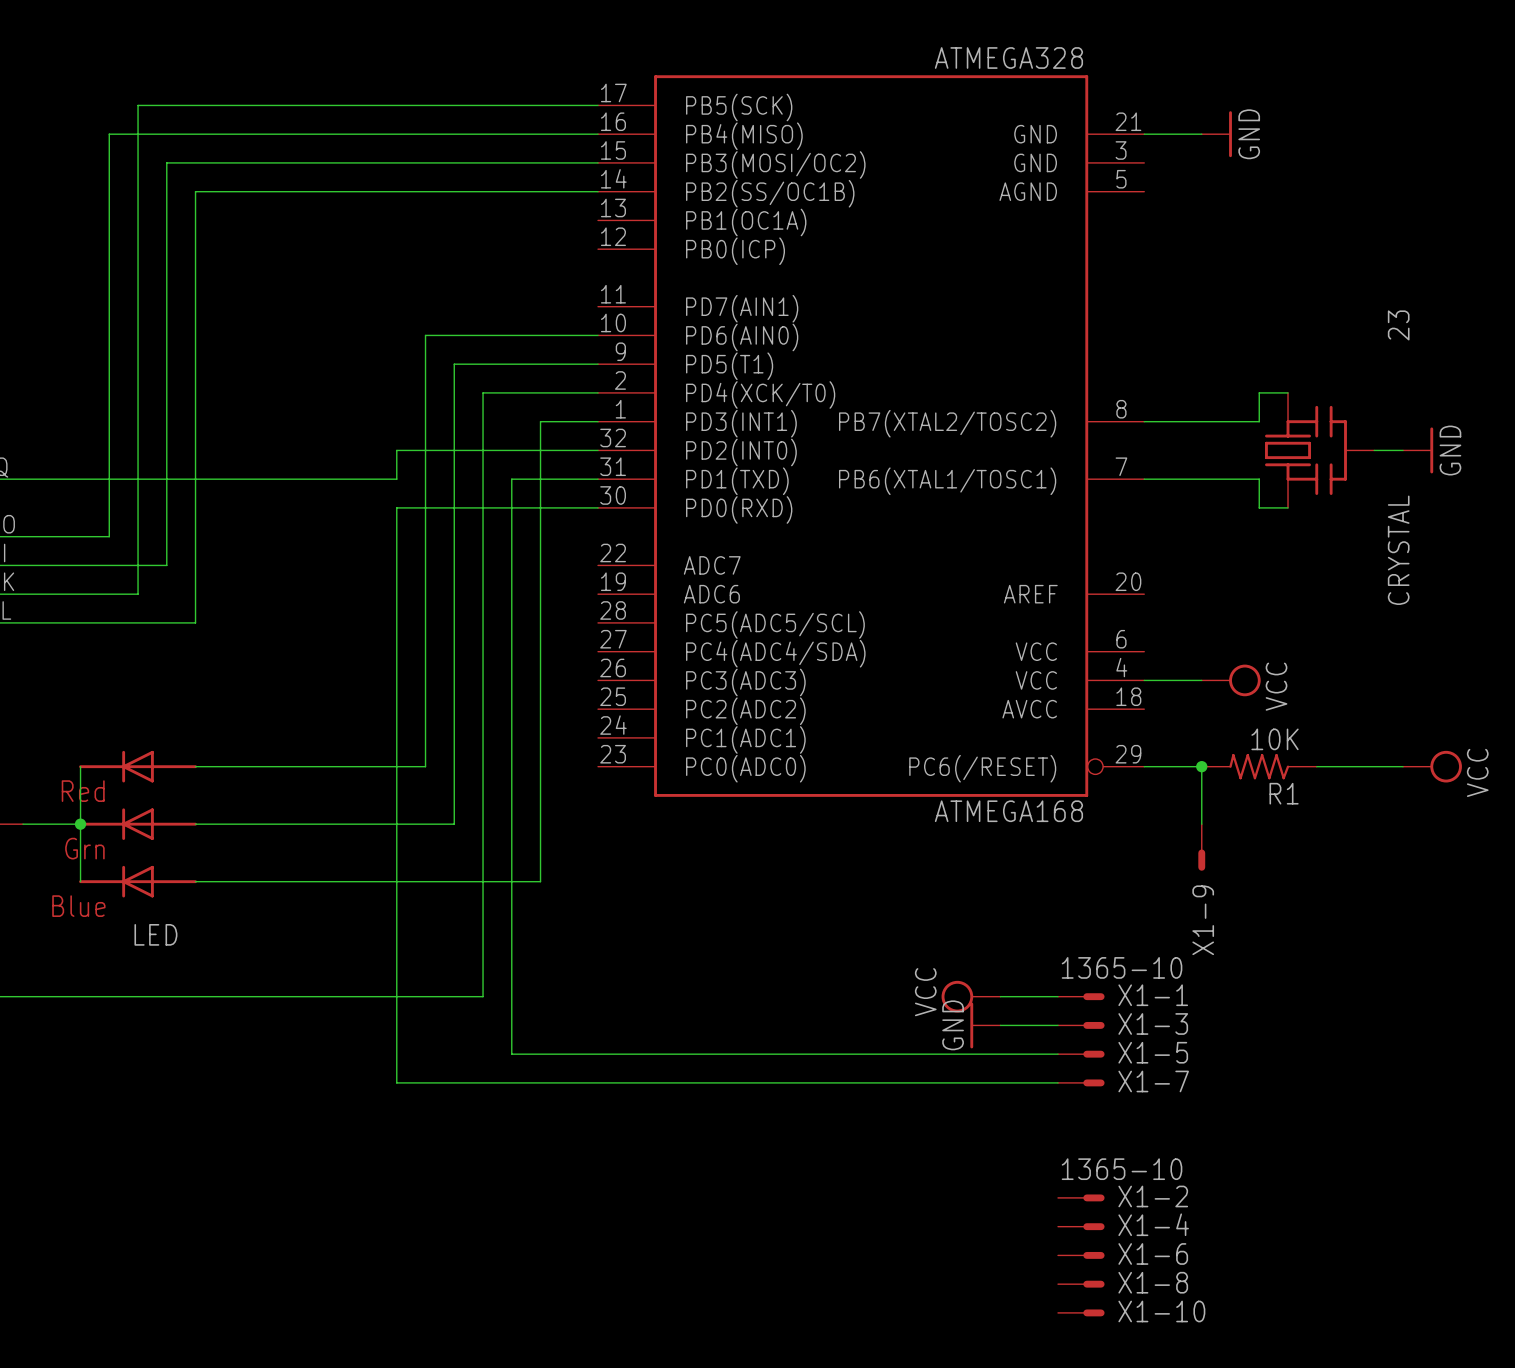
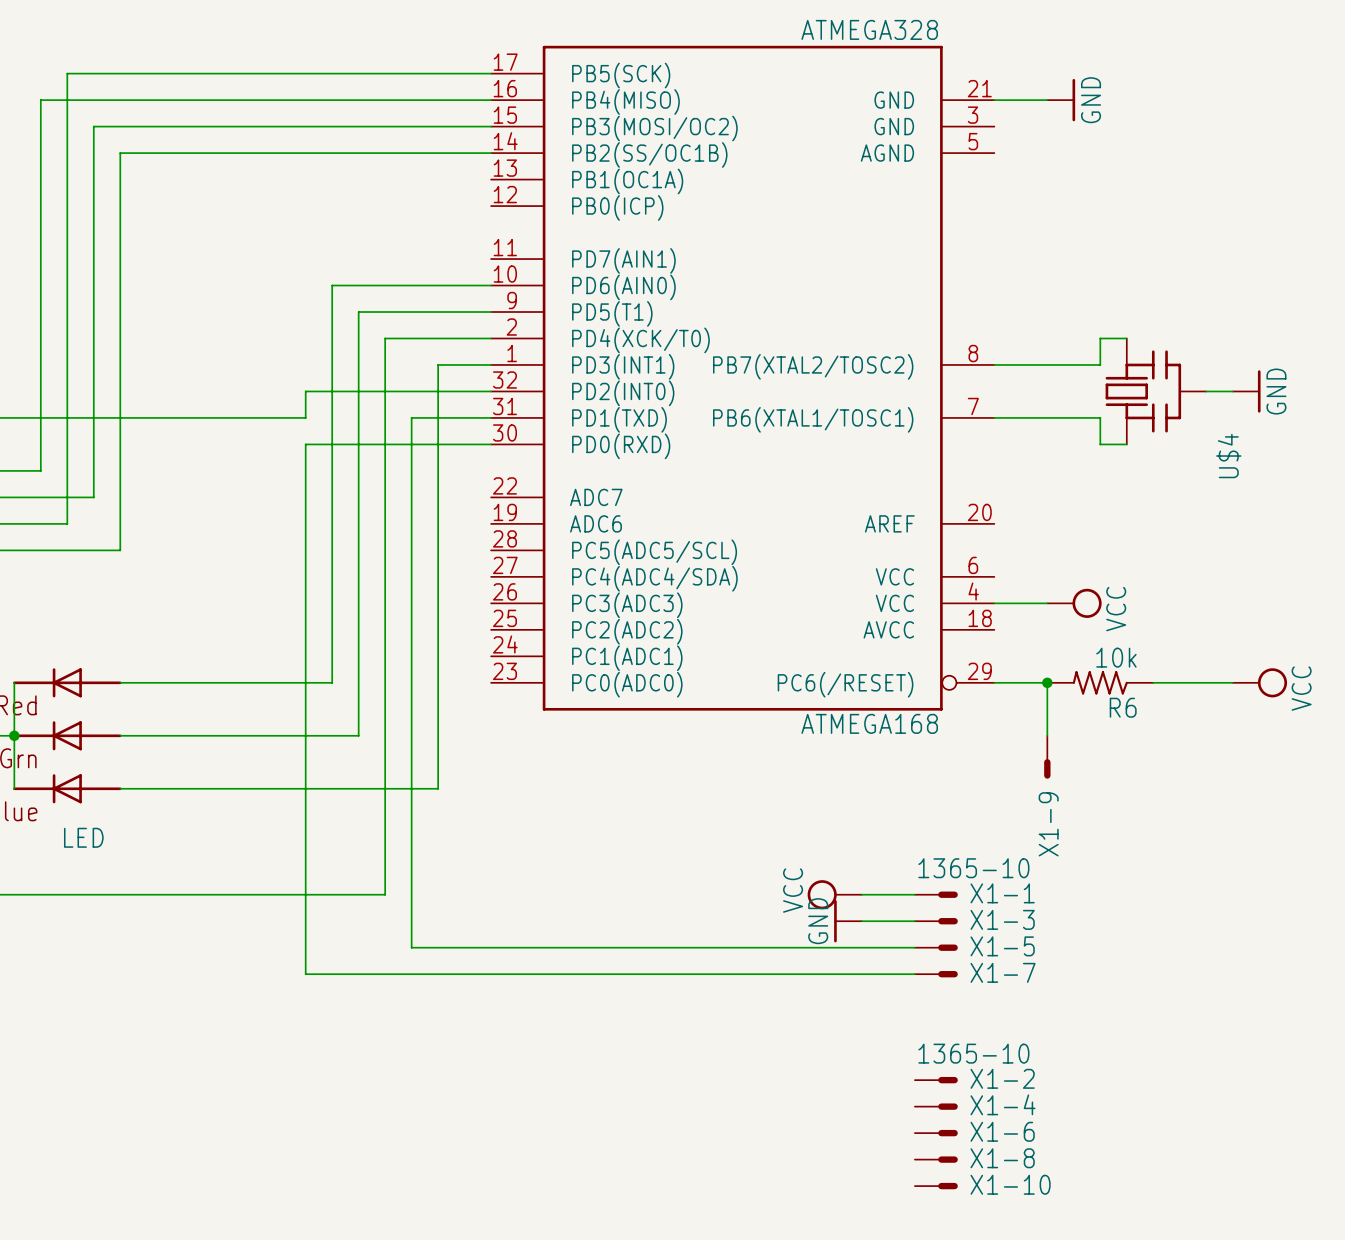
CRYSTAL value: 23 (1398, 325) -> none
CRYSTAL name: CRYSTAL (1398, 550) -> U$4 (1228, 456)
R1 value: 10K (1275, 739) -> 10k (1116, 657)
R1 name: R1 (1284, 793) -> R6 (1123, 707)

